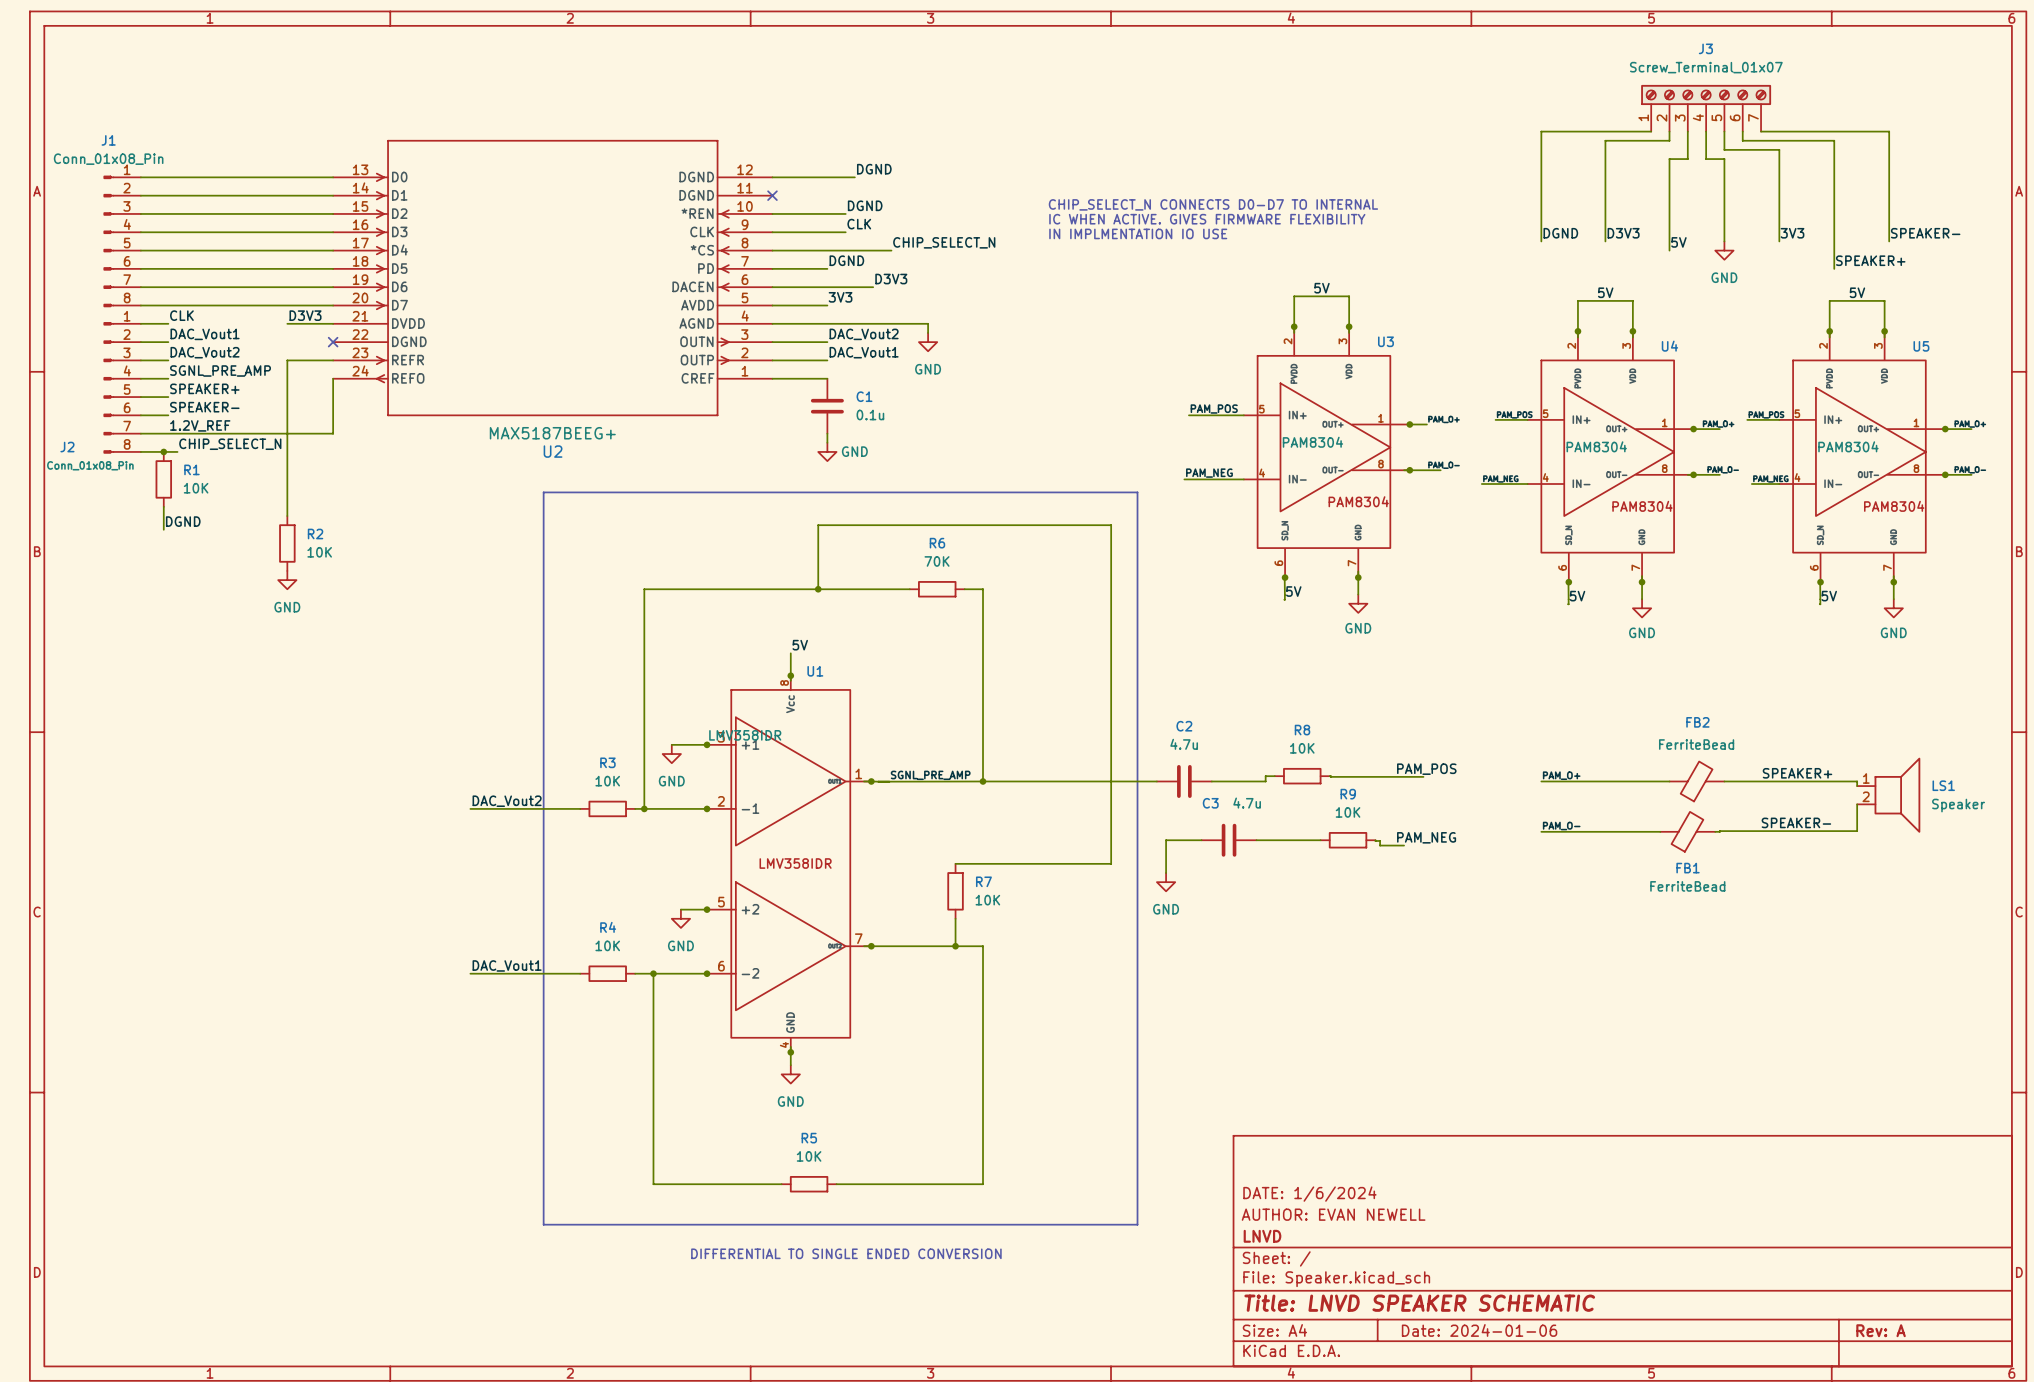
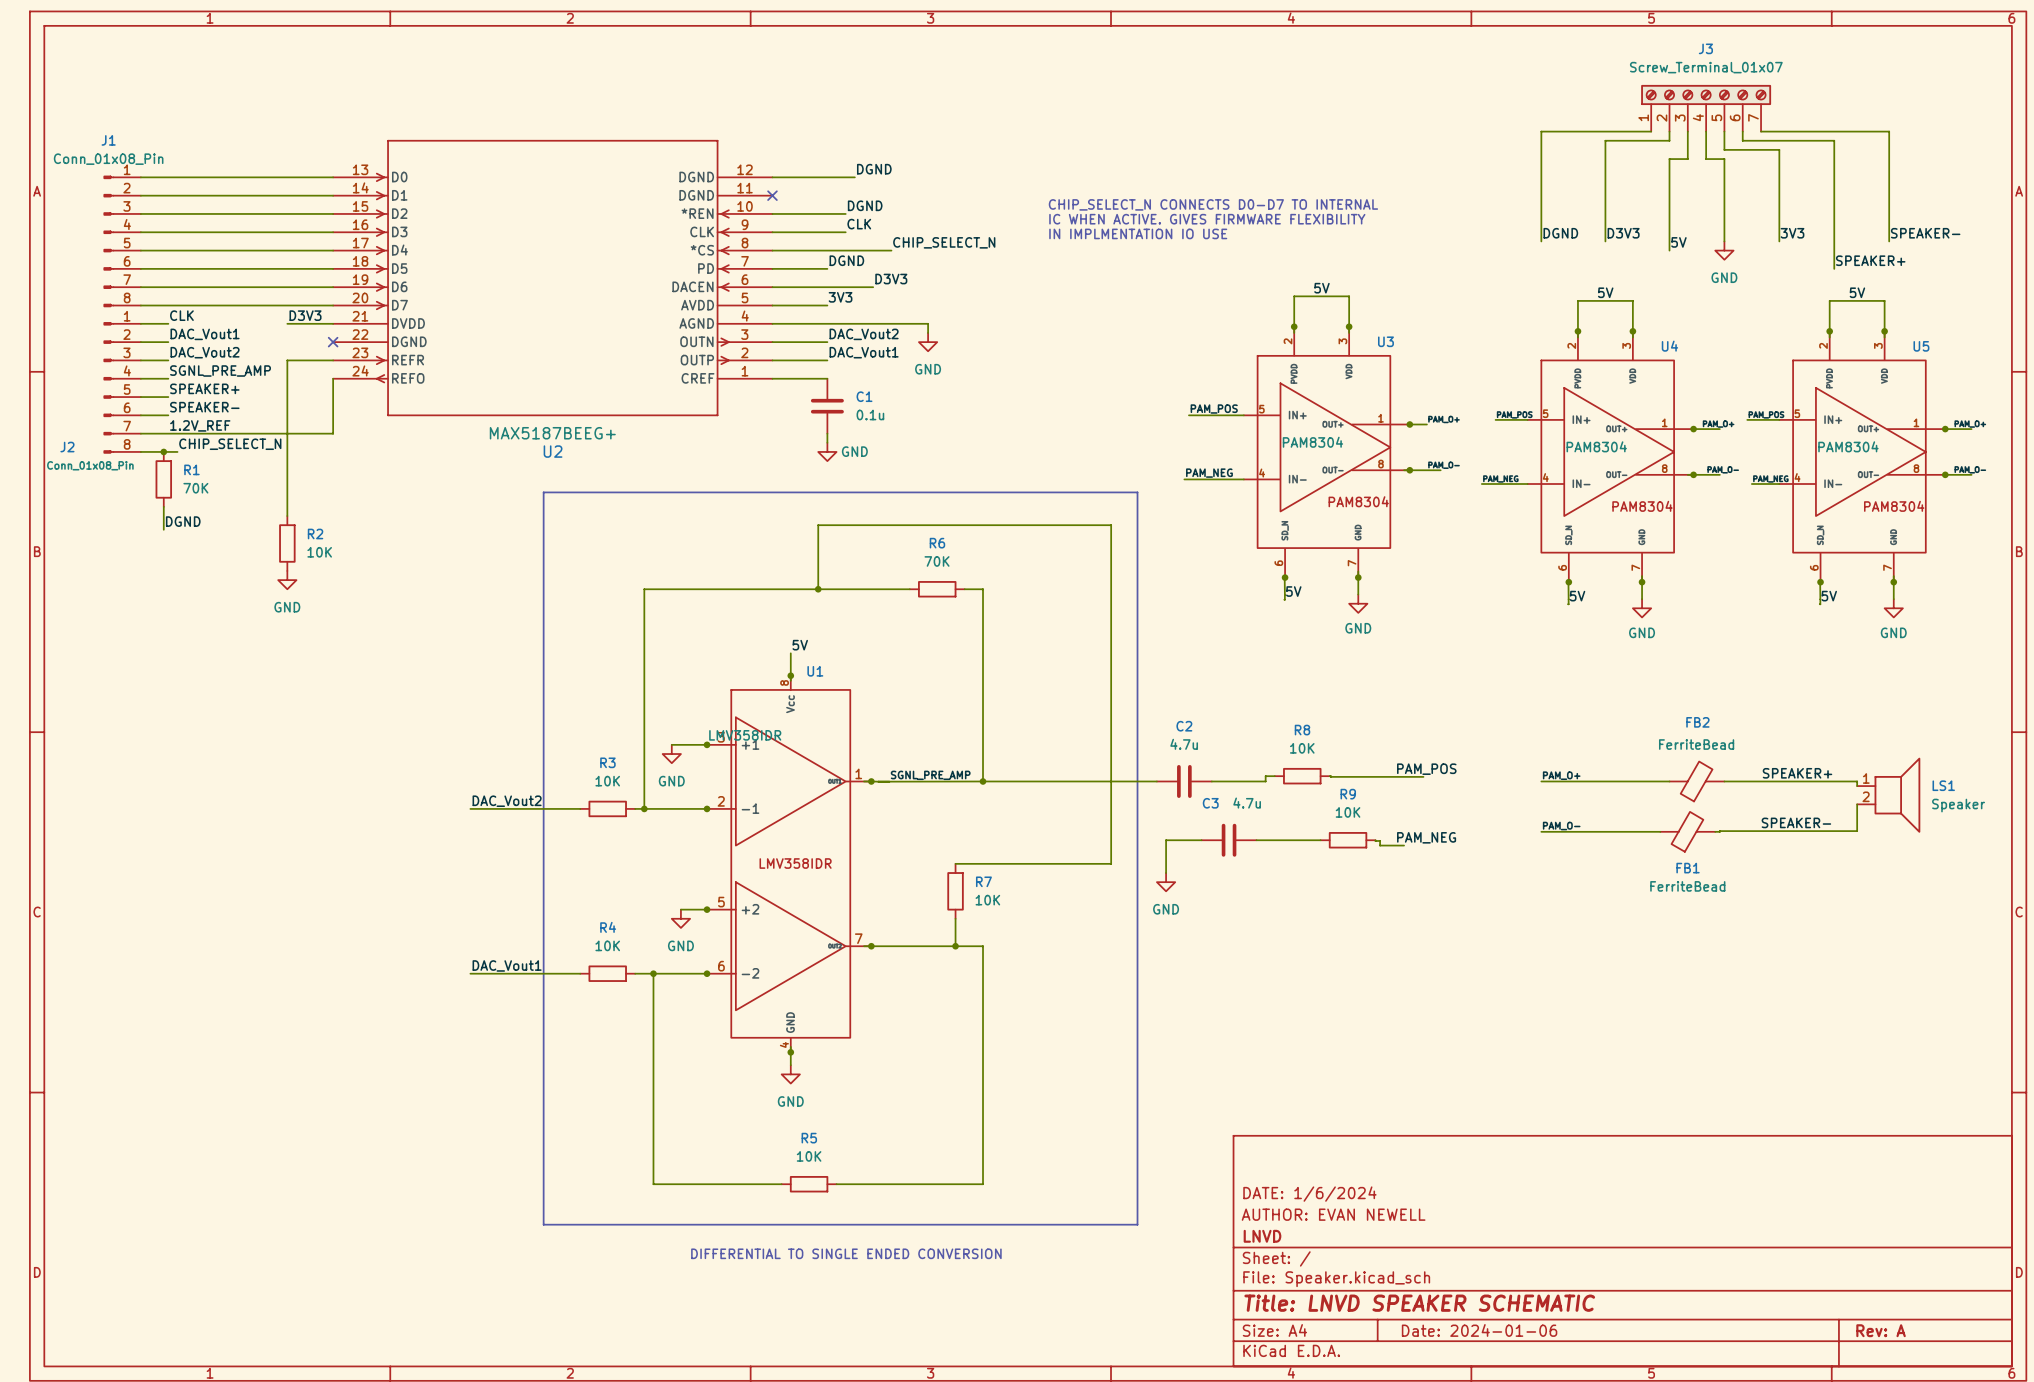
R1 value: 10K (196, 488) -> 70K (195, 488)

